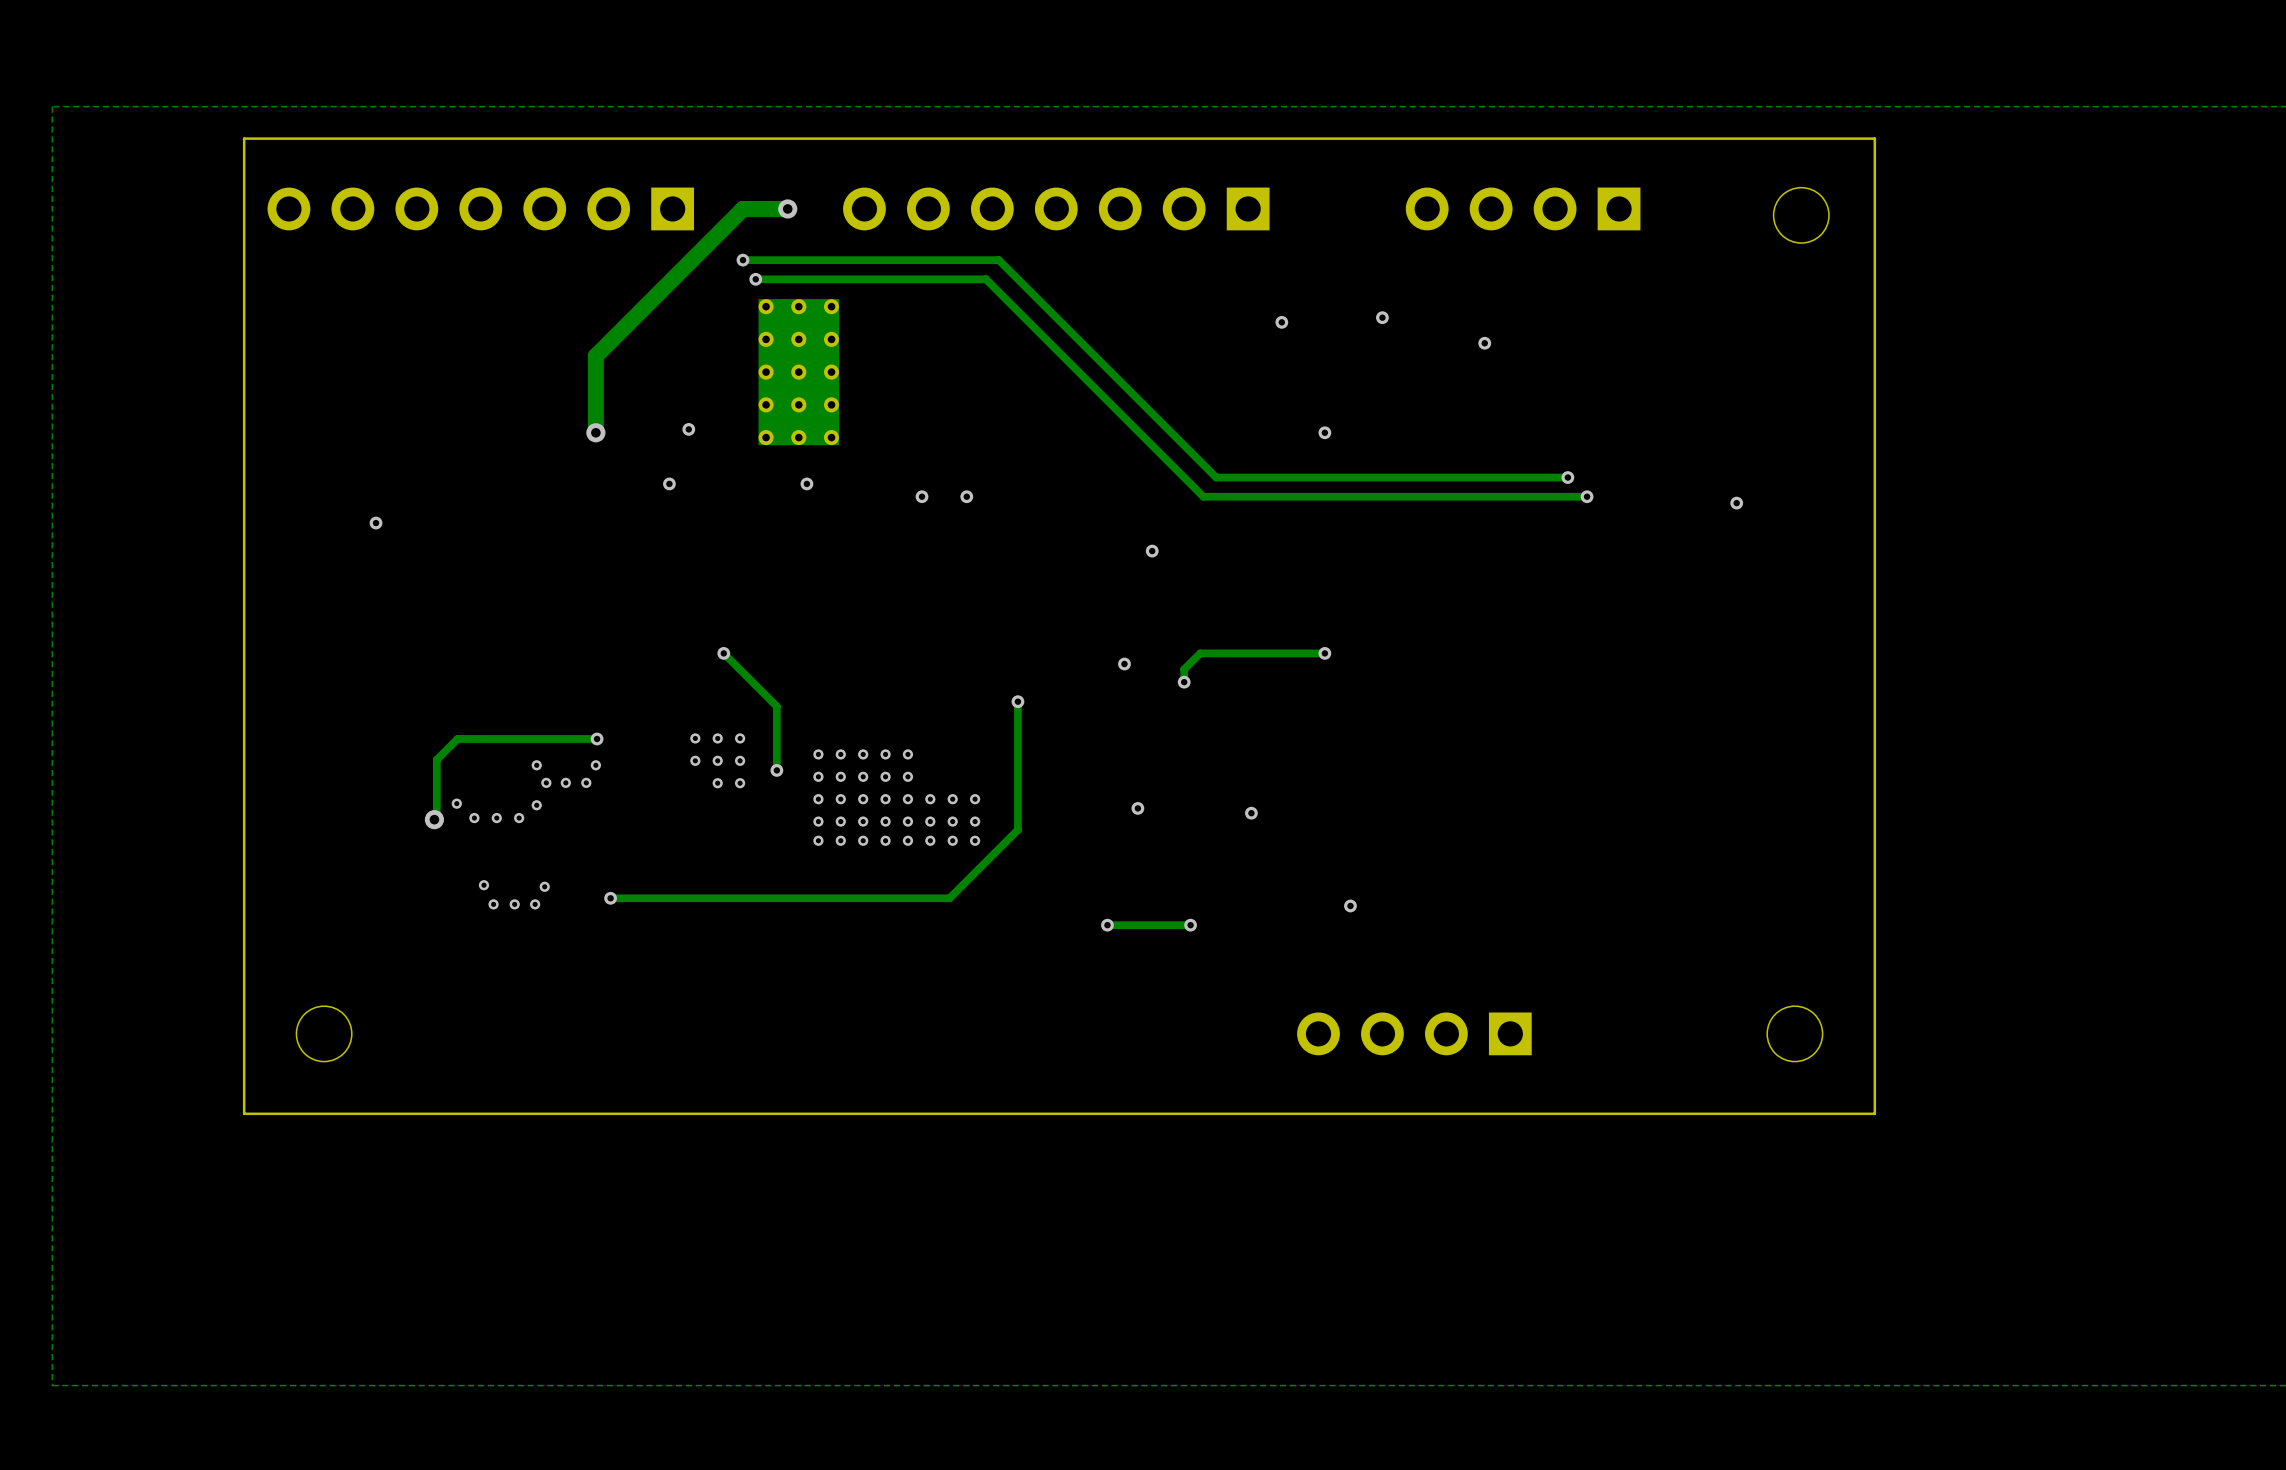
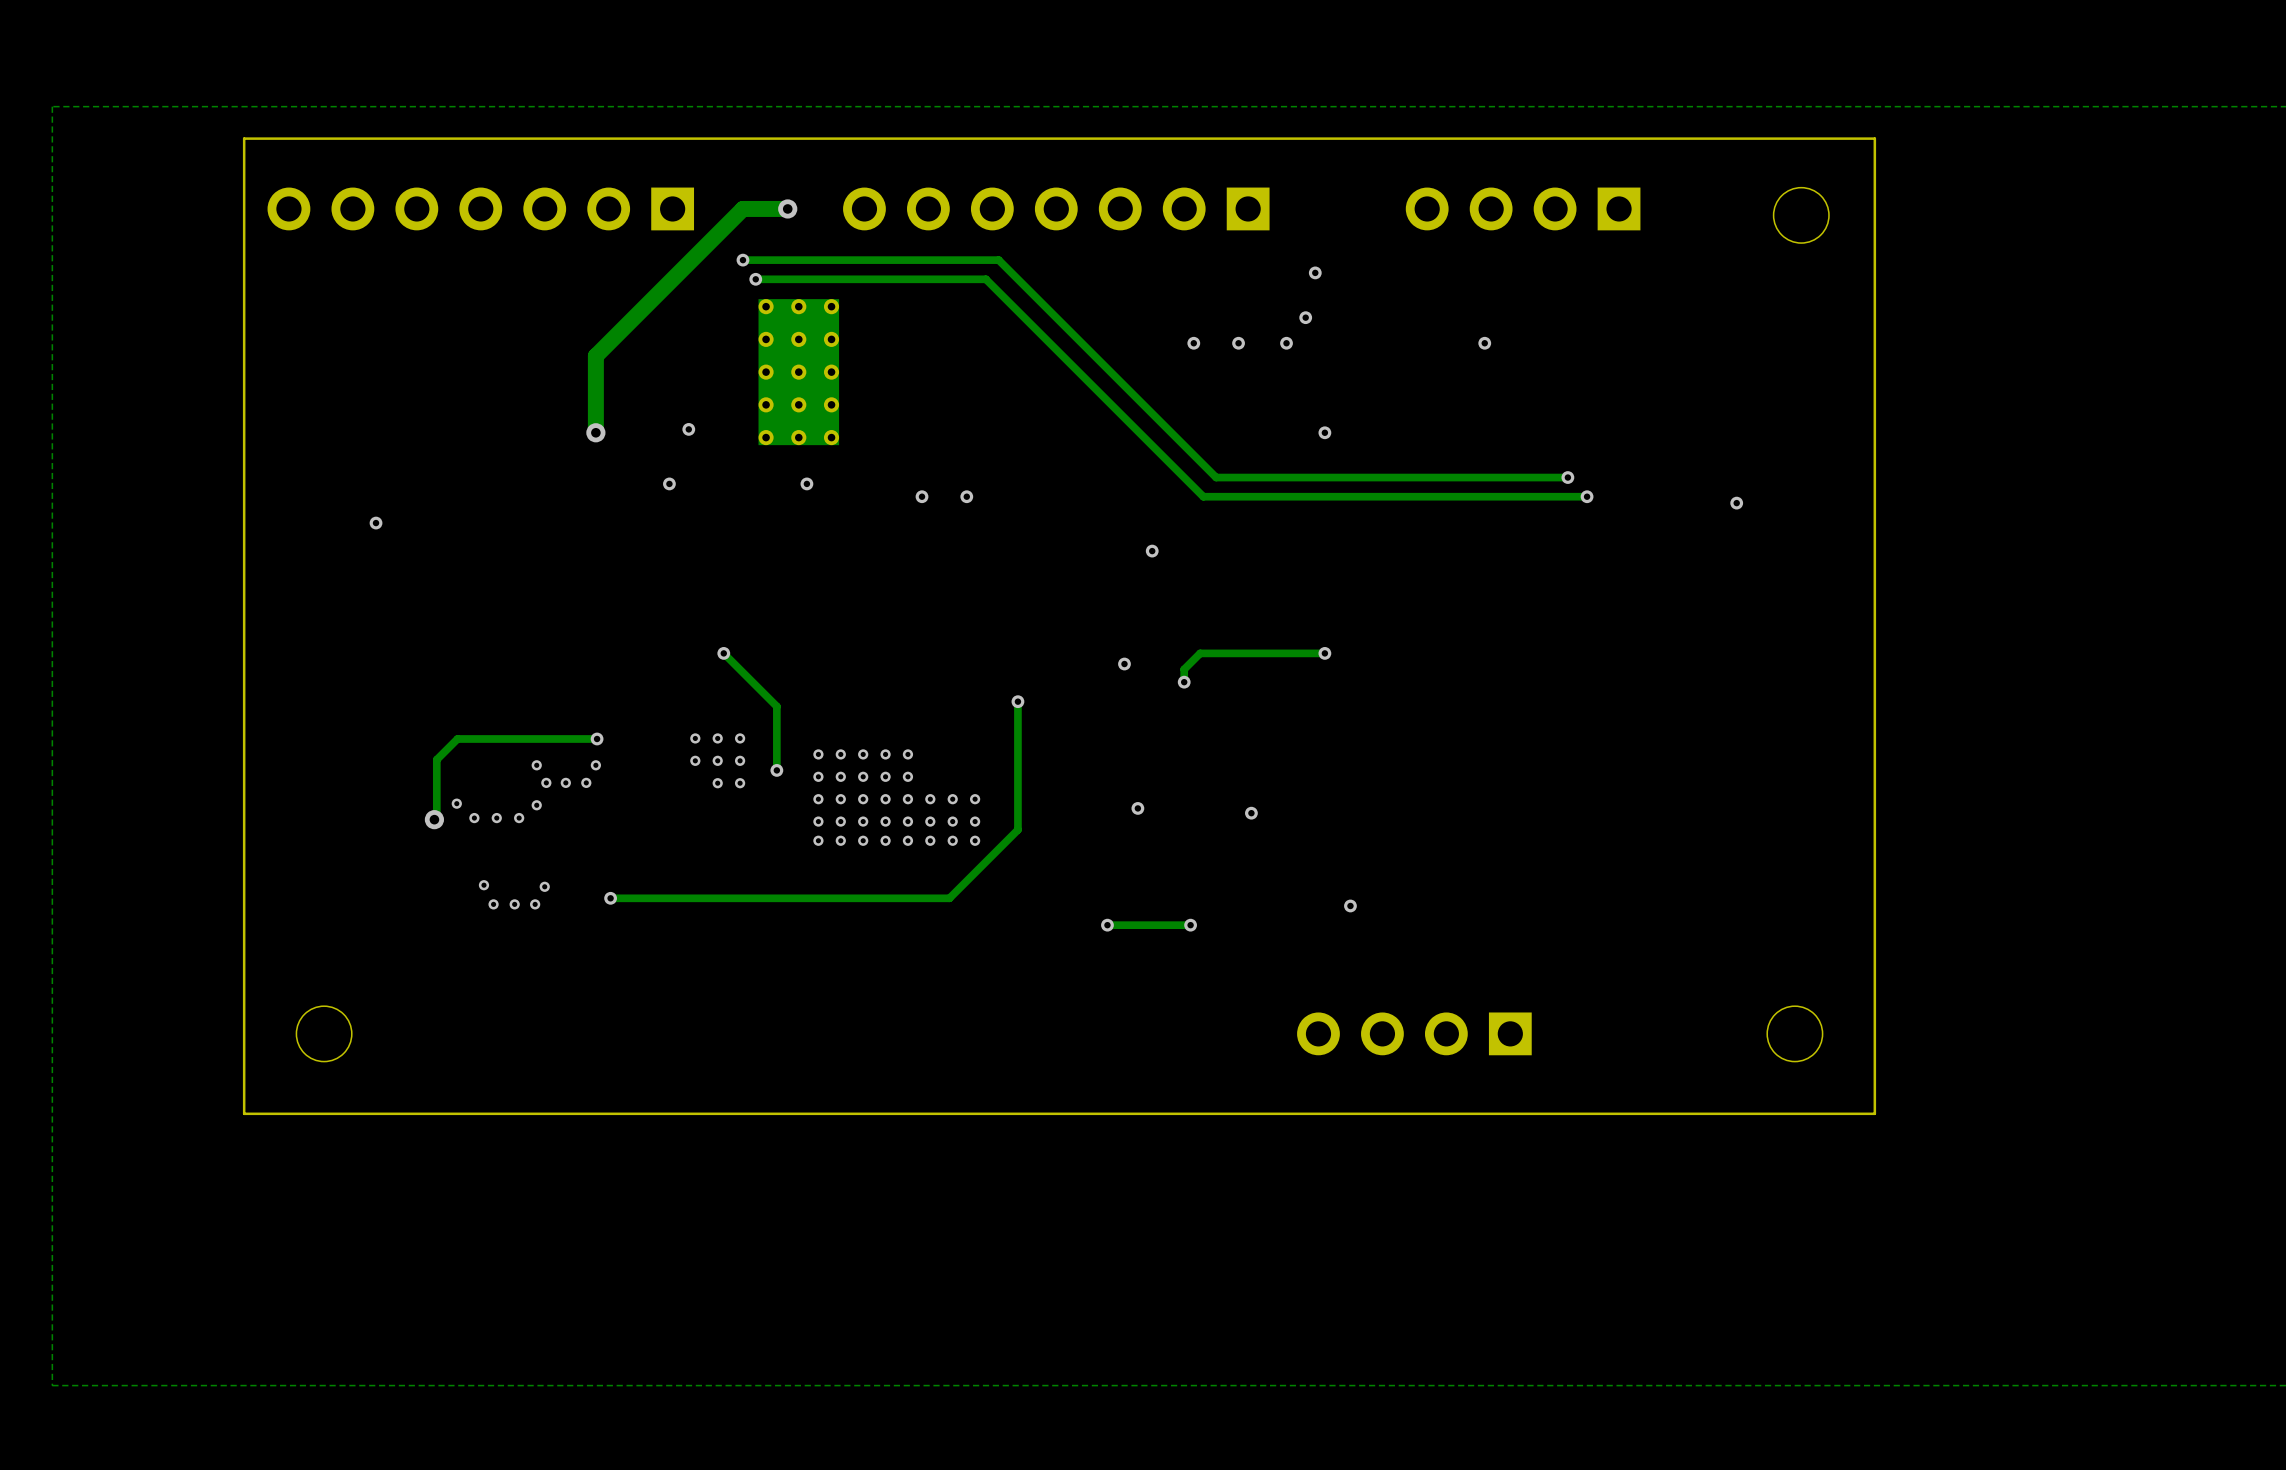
via: none -> (1315, 272)
via: none -> (1305, 317)
via: (1382, 317) -> none
via: (1281, 322) -> none
via: none -> (1193, 343)
via: none -> (1238, 343)
via: none -> (1286, 343)

